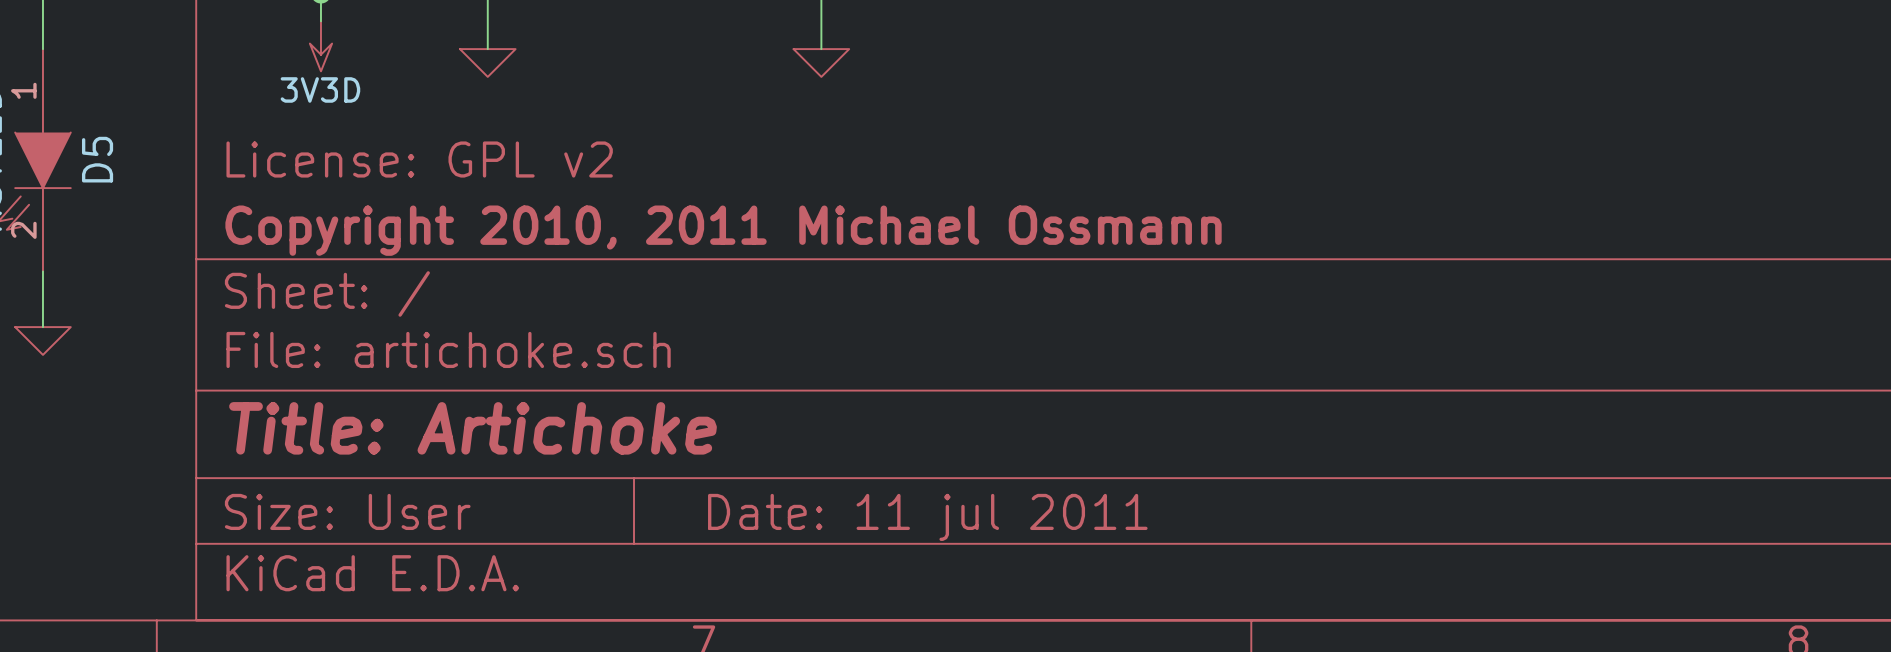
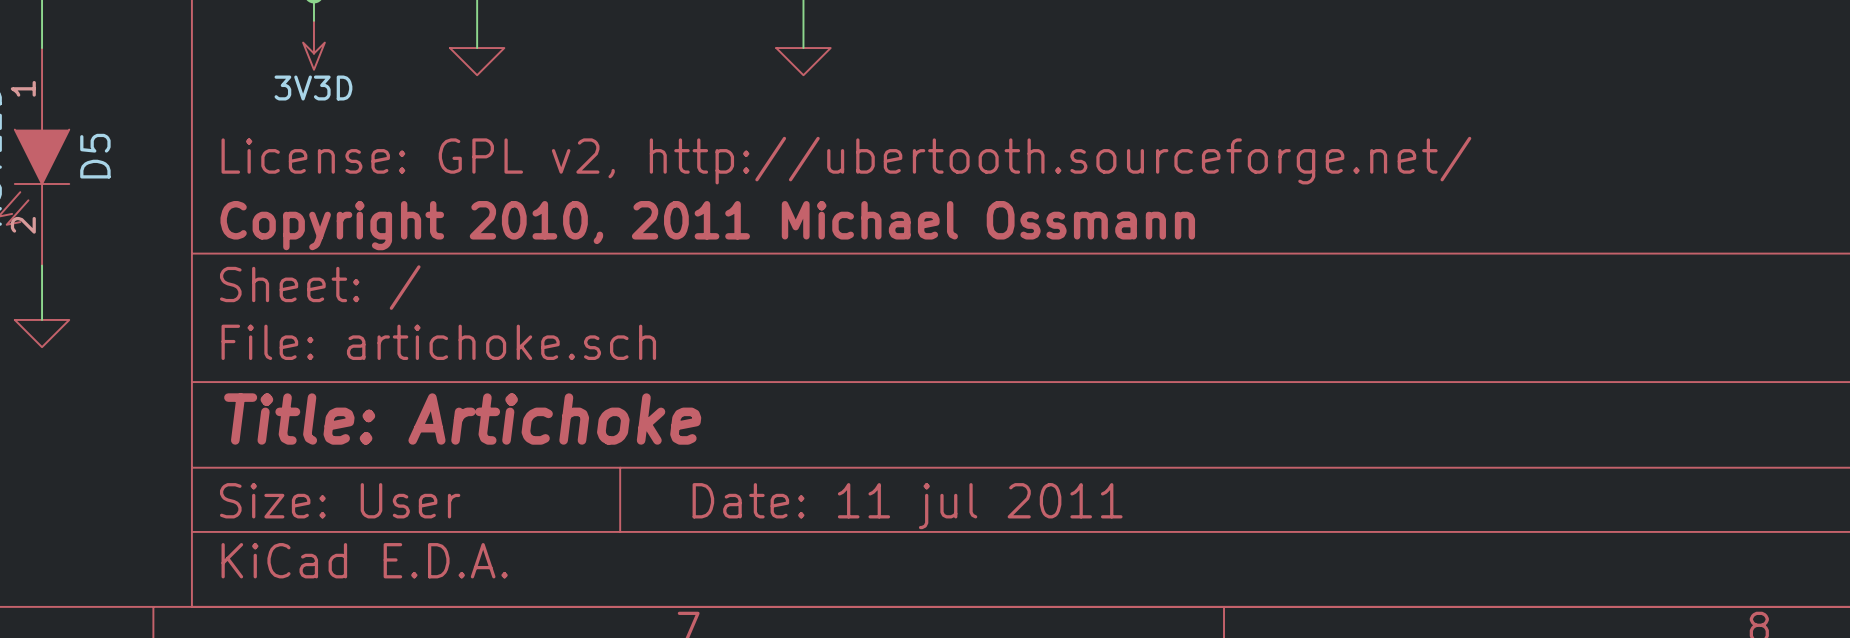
title block: License: GPL v2 (419, 159) -> License: GPL v2, http://ubertooth.sourceforge.net/ (846, 160)

